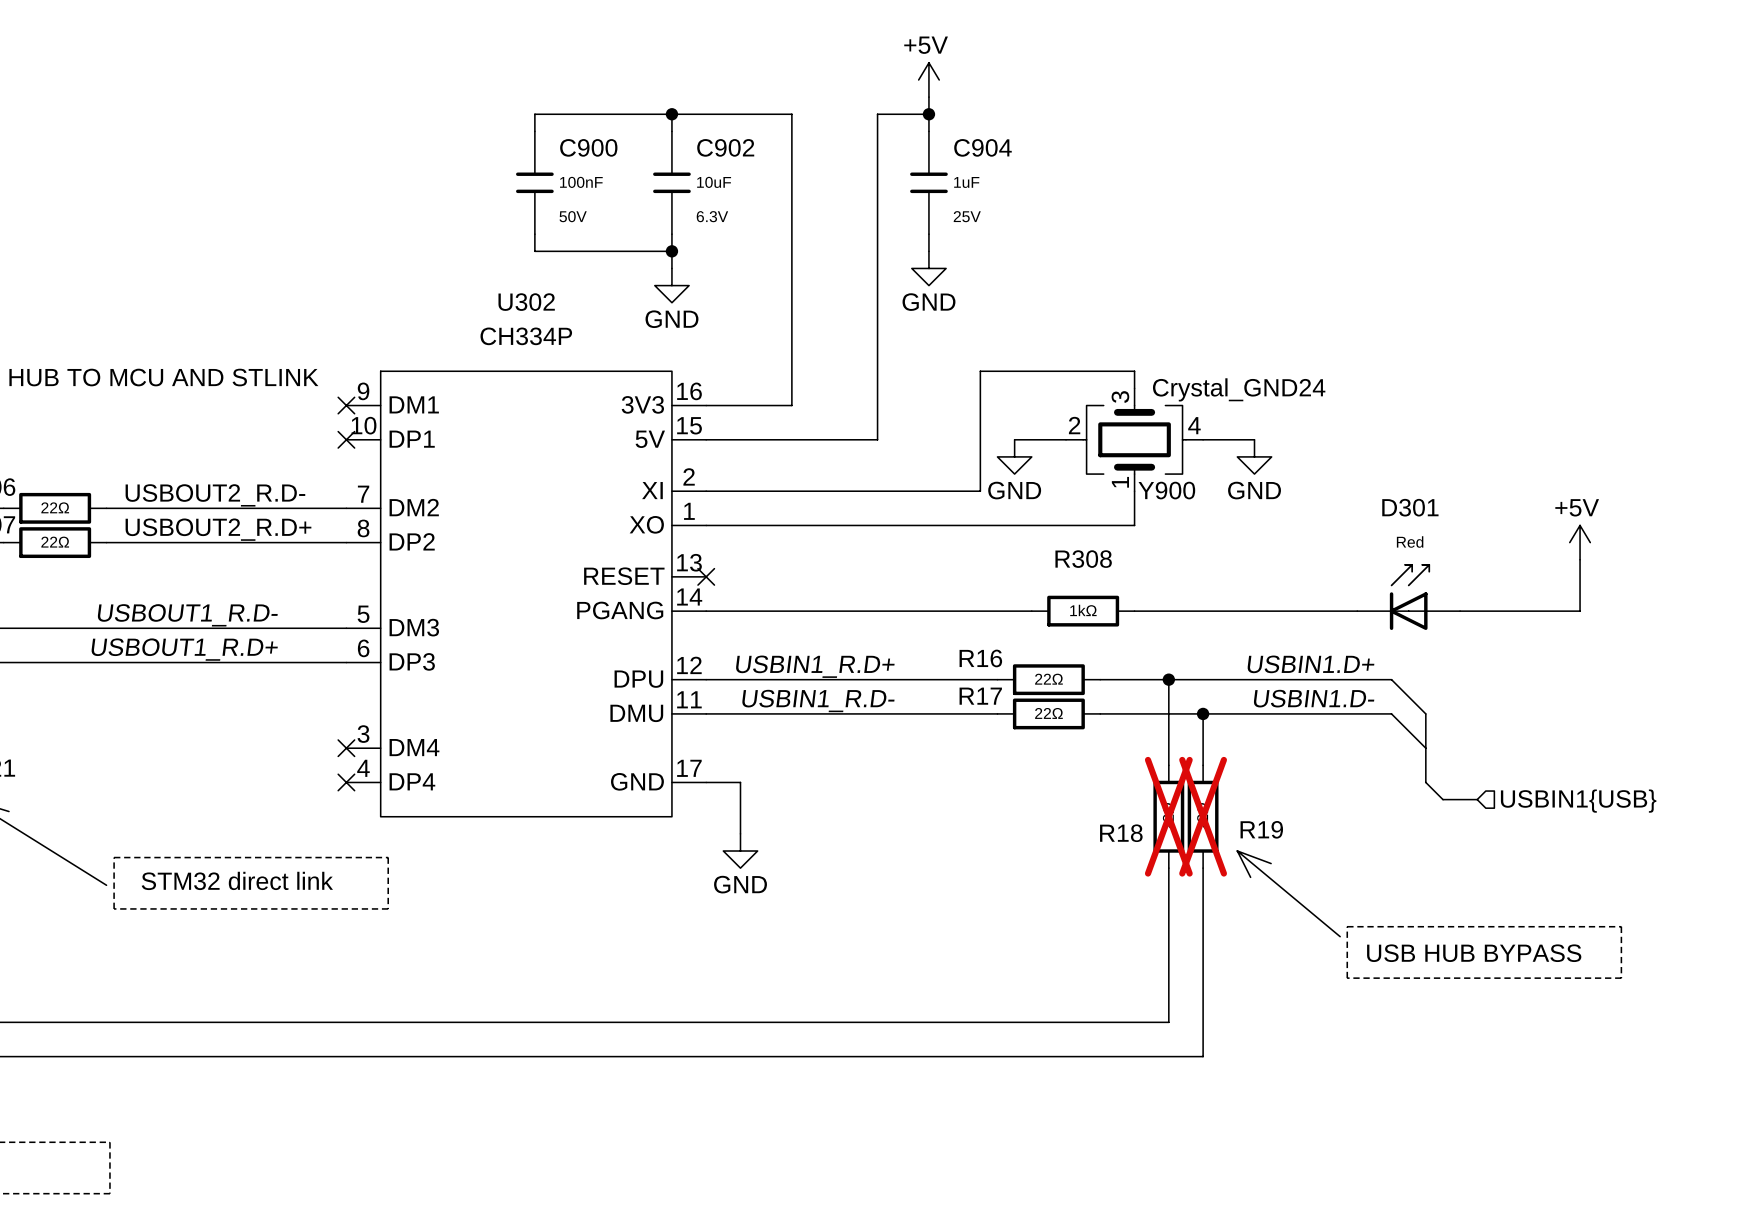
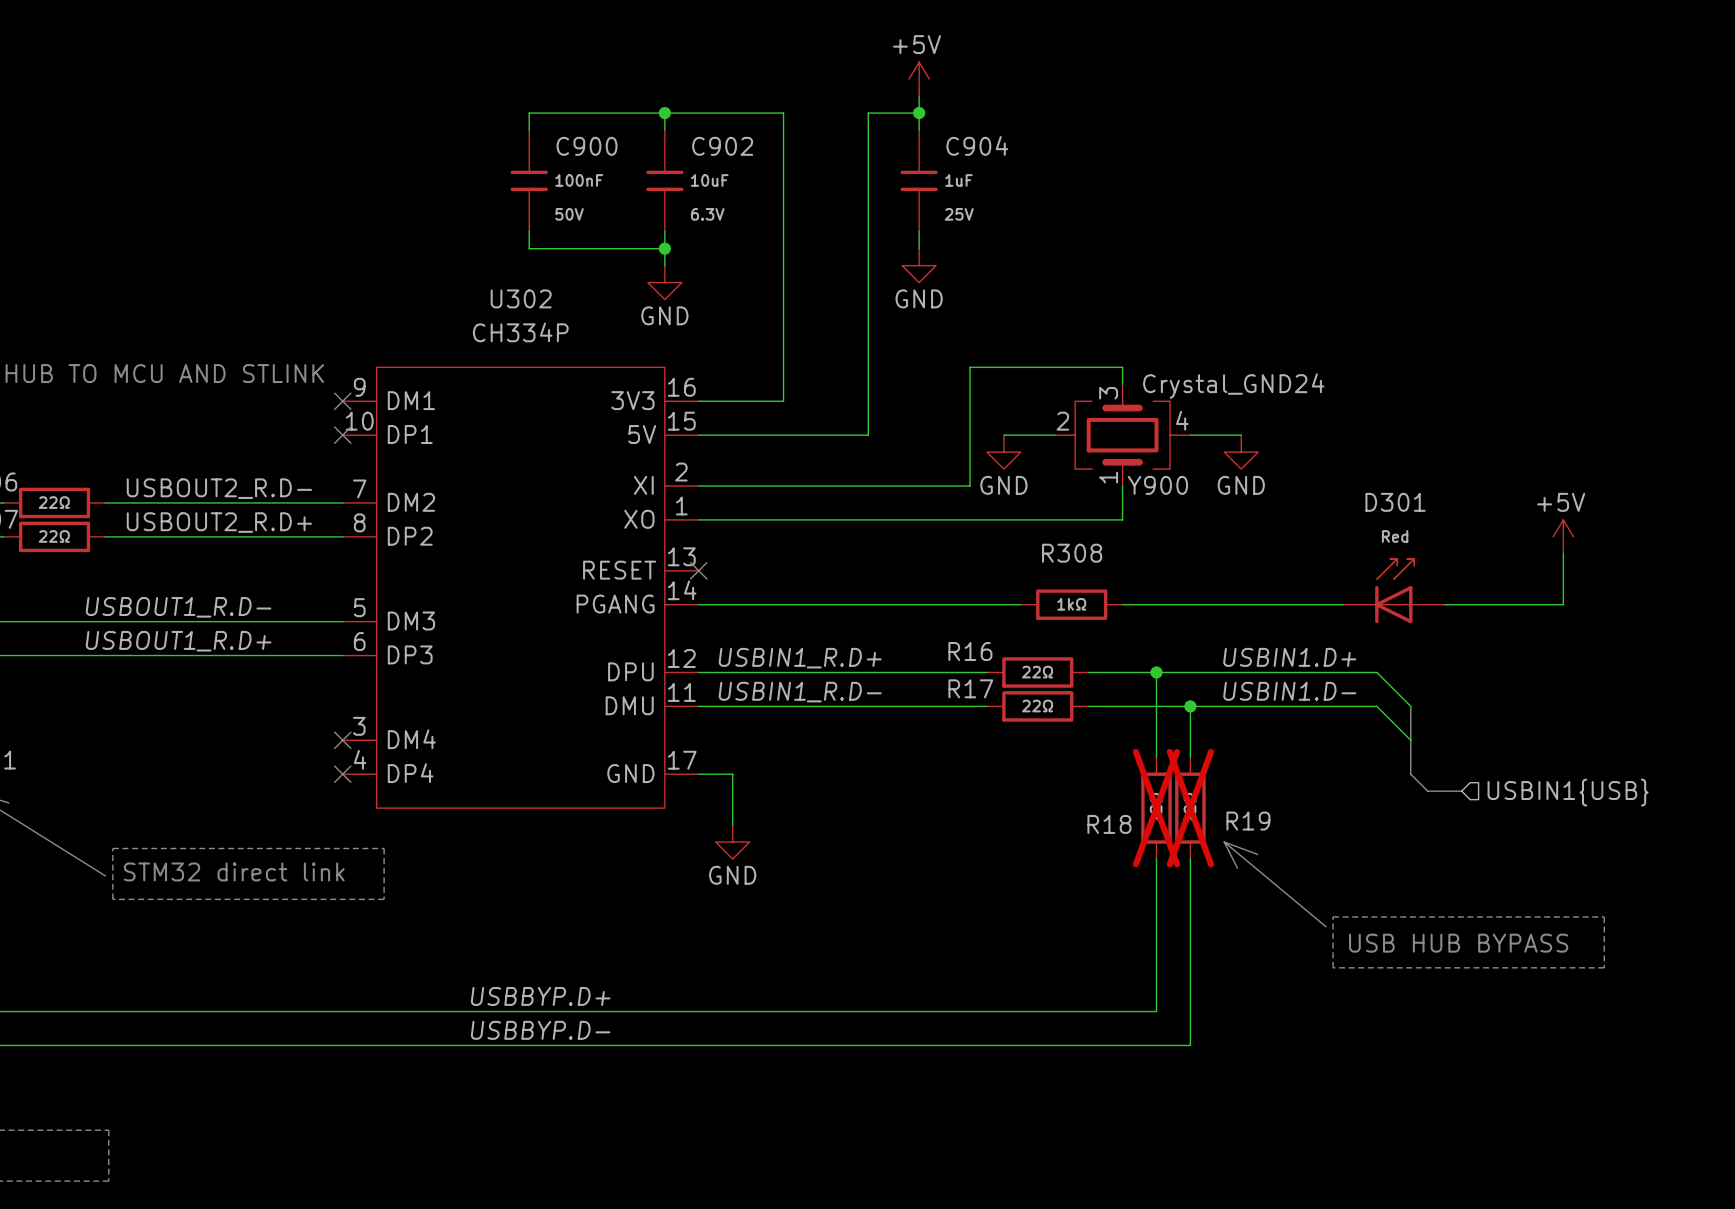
label: none -> USBBYP.D+ (540, 996)
label: none -> USBBYP.D- (540, 1030)

